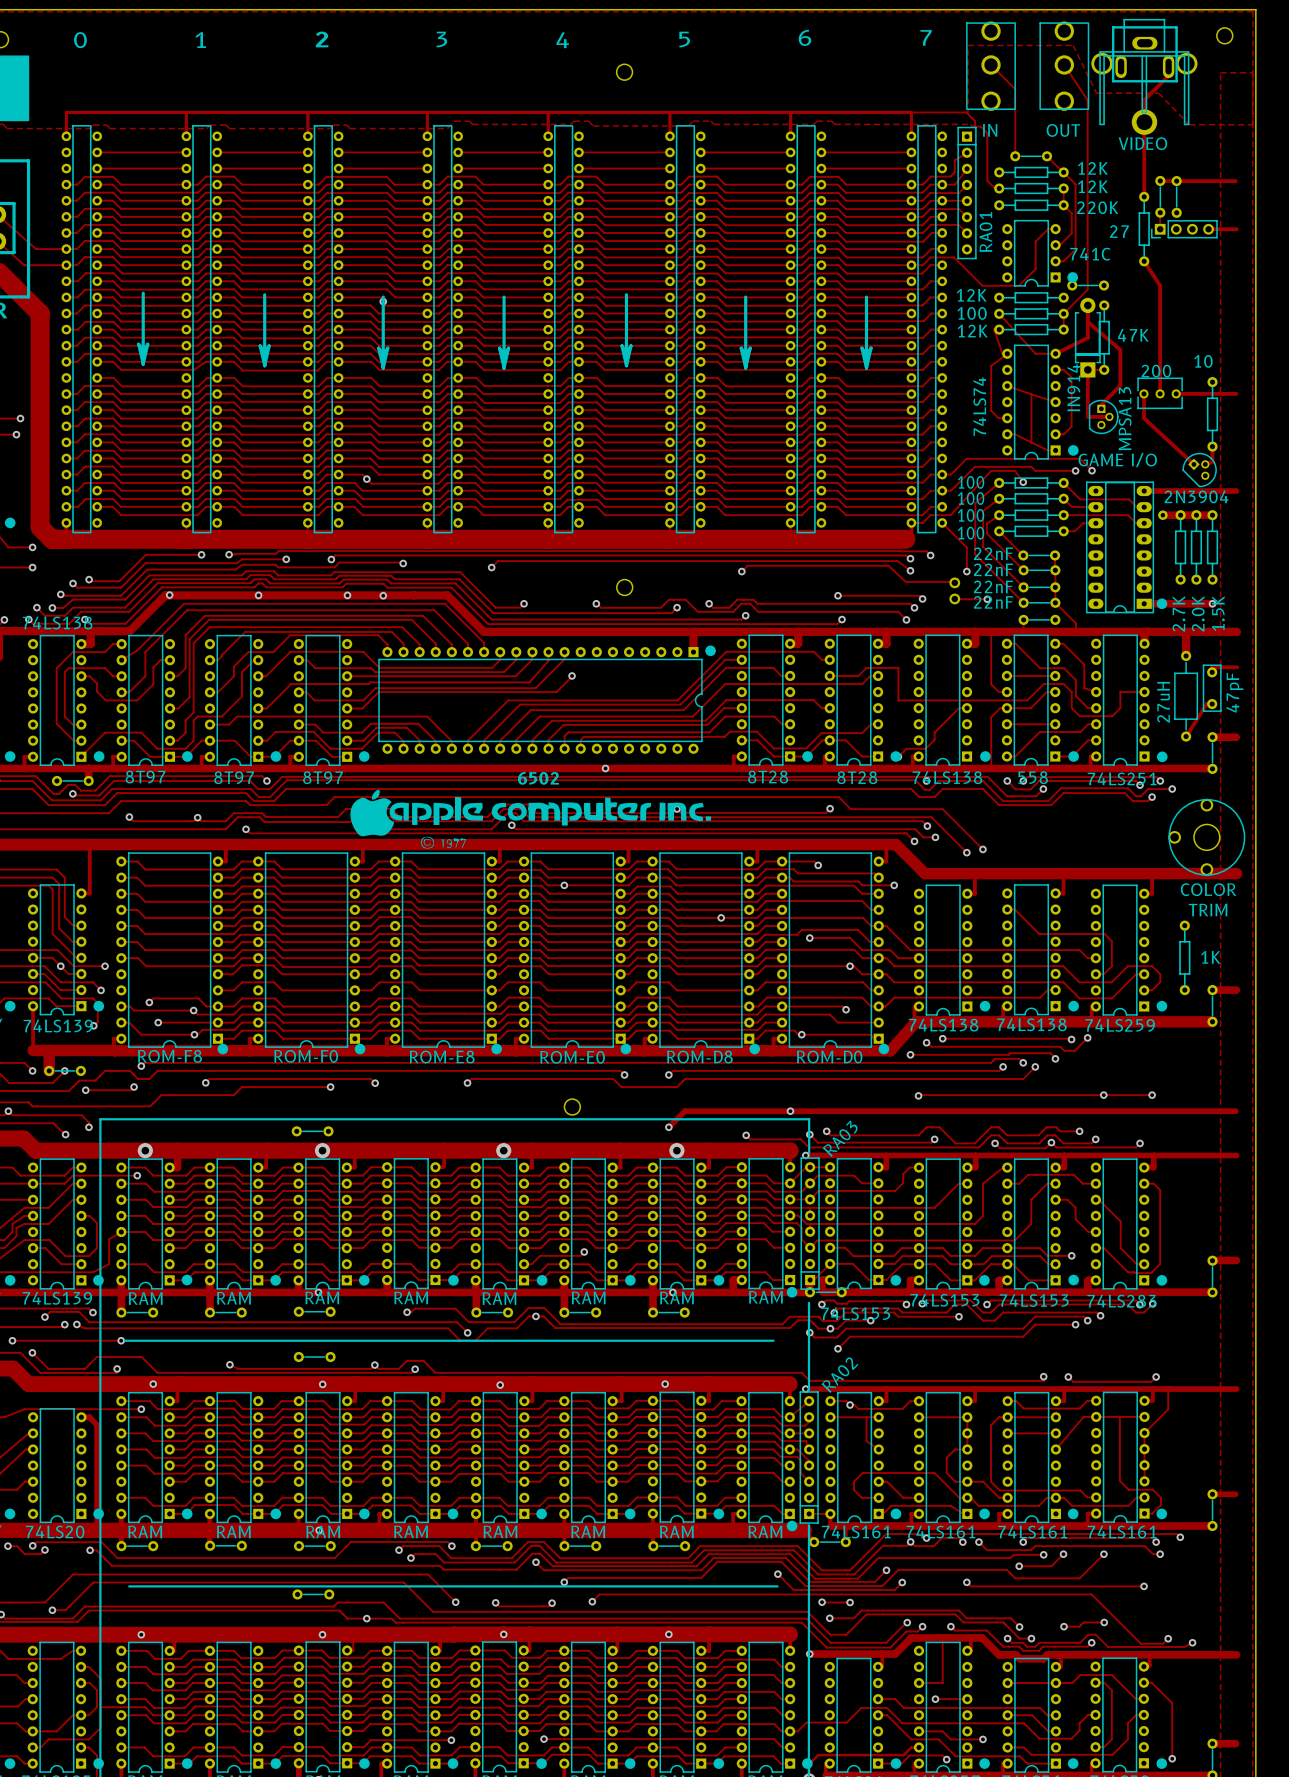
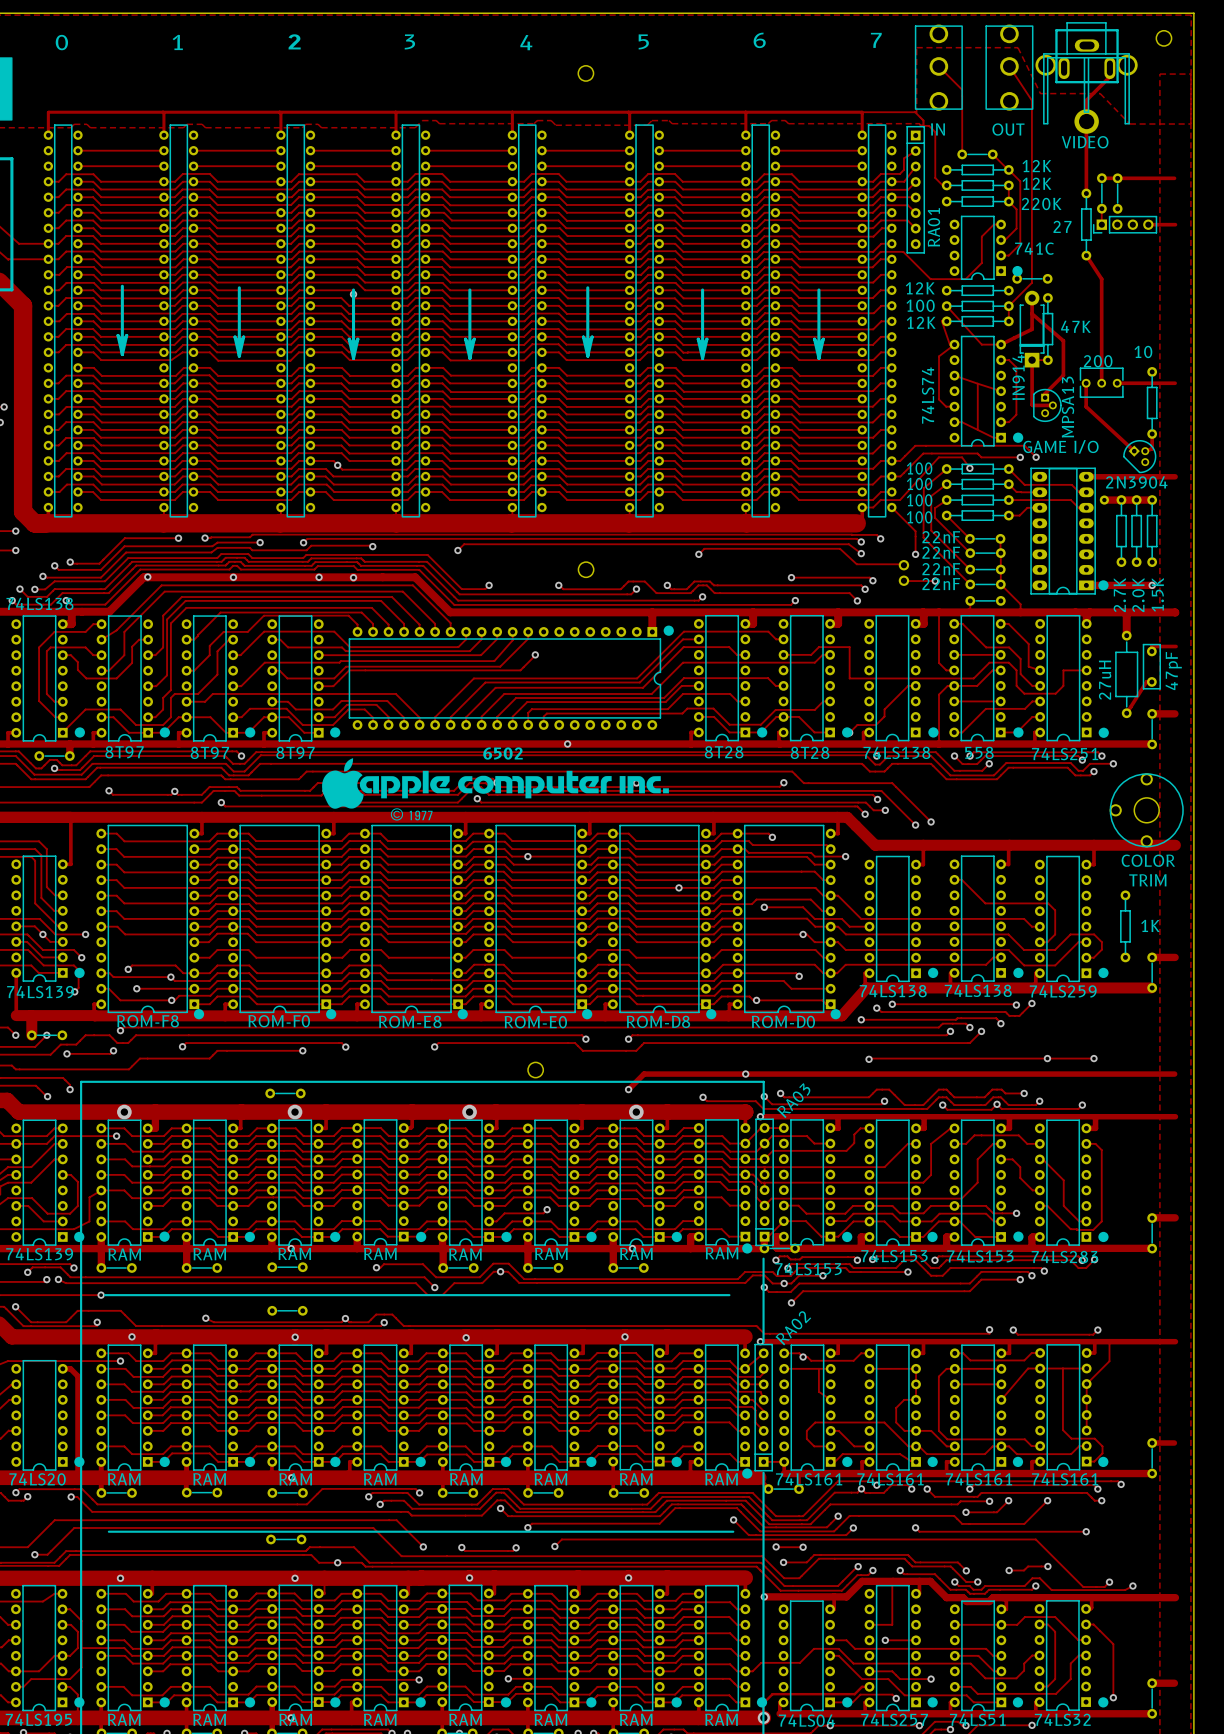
drawing: none -> [322, 758, 669, 821]
drawing: [350, 789, 712, 849] -> none

